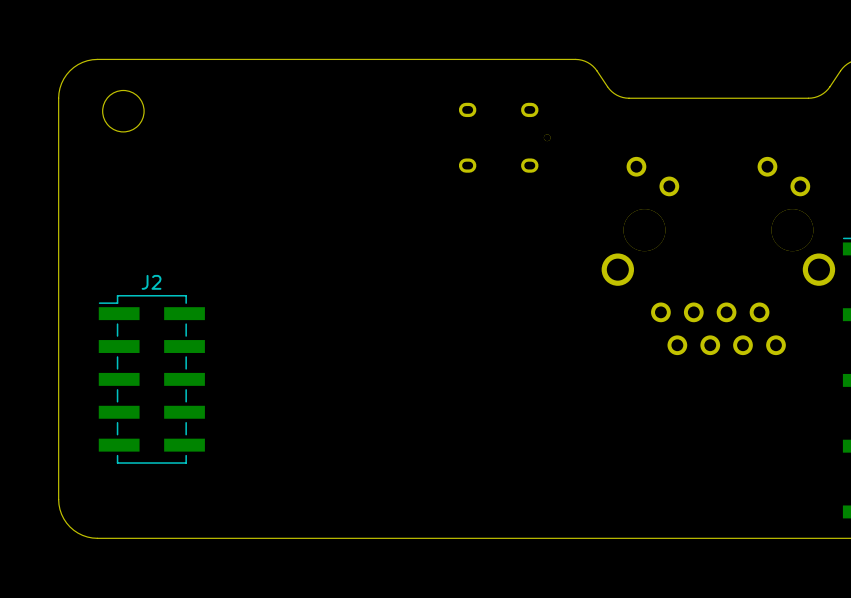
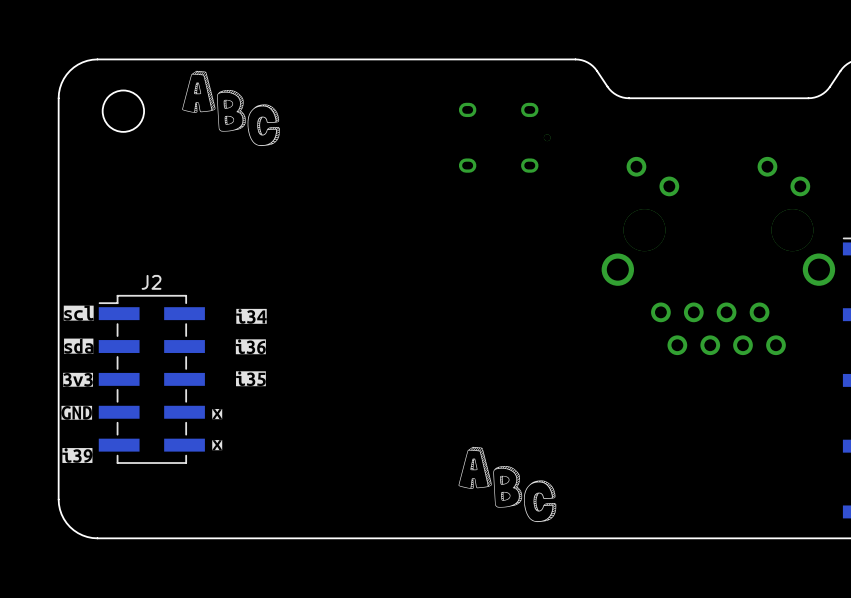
drawing: none -> [182, 70, 280, 147]
drawing: none -> [63, 305, 94, 321]
drawing: none -> [235, 308, 267, 355]
drawing: none -> [64, 338, 94, 354]
drawing: none -> [236, 371, 266, 387]
drawing: none -> [63, 372, 93, 387]
drawing: none -> [61, 405, 93, 420]
drawing: none -> [212, 408, 223, 420]
drawing: none -> [212, 440, 223, 451]
drawing: none -> [458, 446, 557, 523]
drawing: none -> [62, 448, 93, 463]

